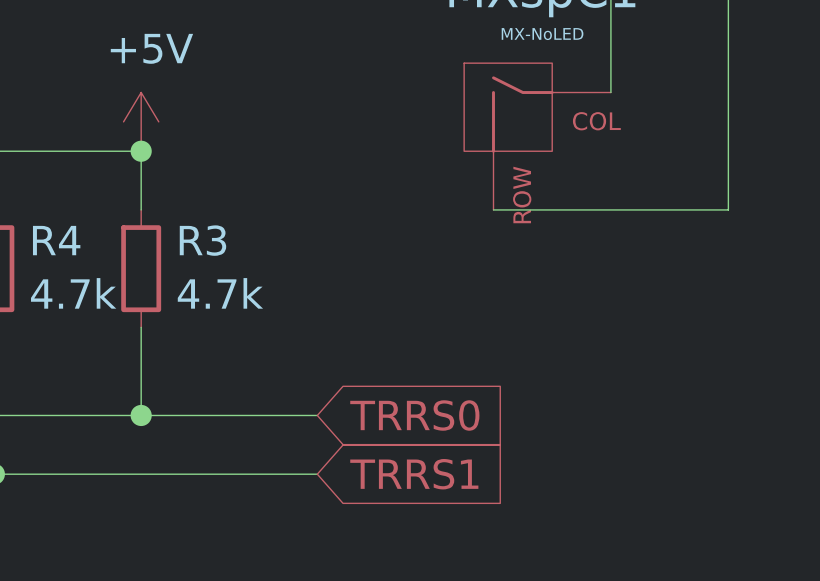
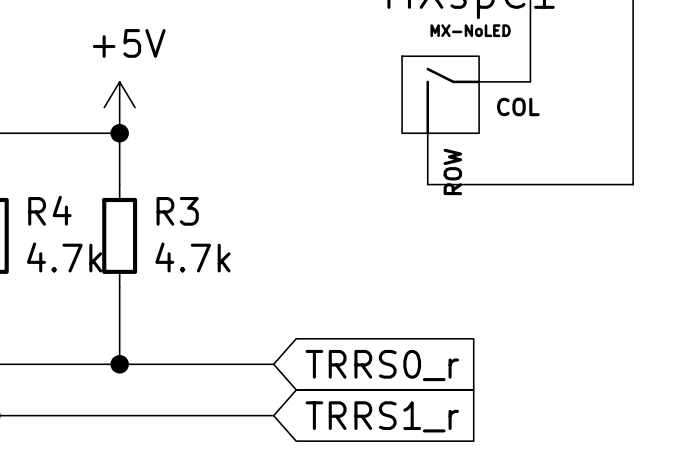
global label: TRRS0 (414, 415) -> TRRS0_r (382, 365)
global label: TRRS1 (414, 474) -> TRRS1_r (382, 416)

